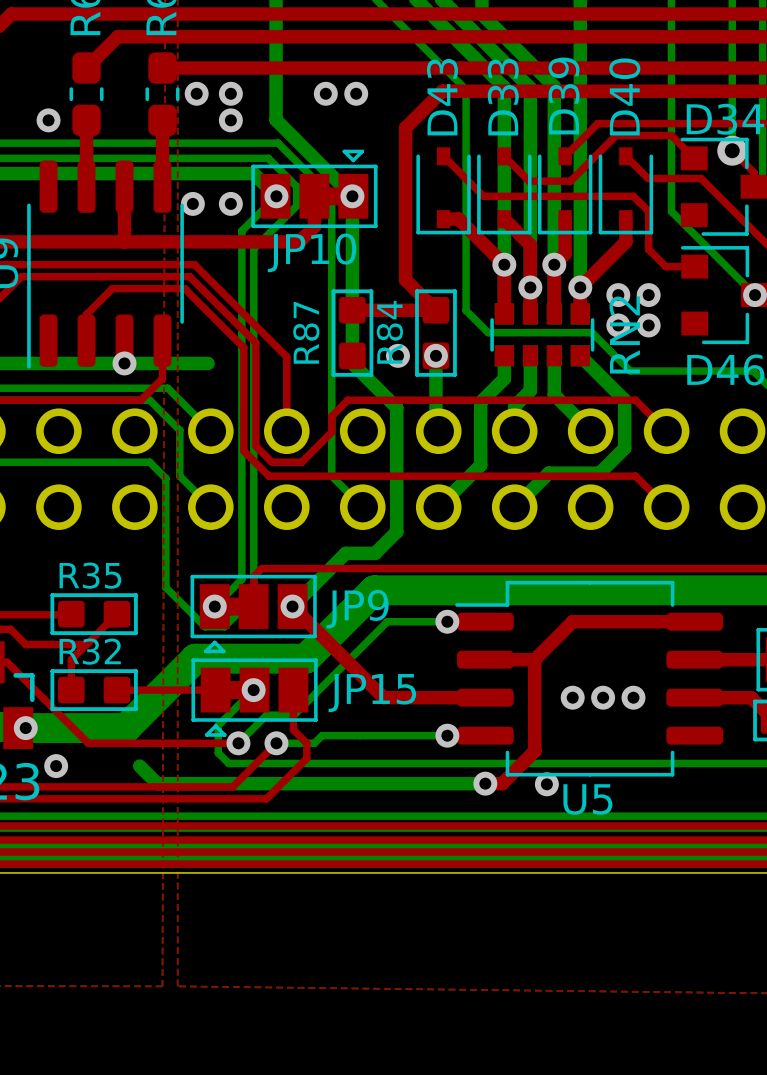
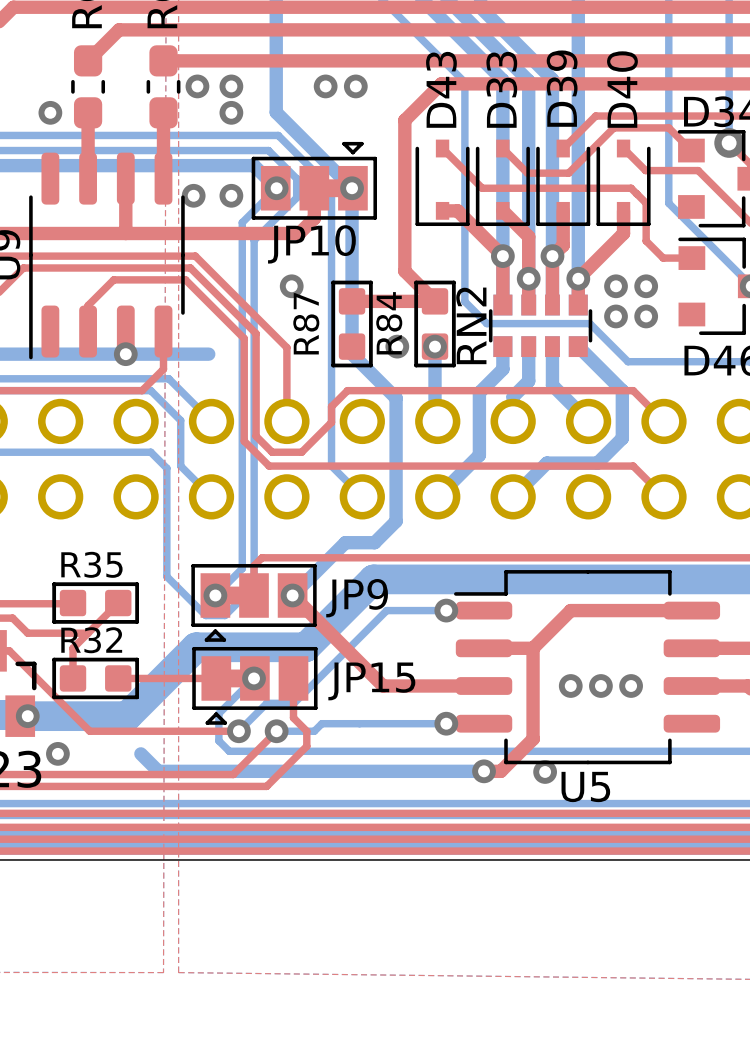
via: none -> (291, 286)
RN2 name position: RN2 (624, 334) -> RN2 (471, 325)

